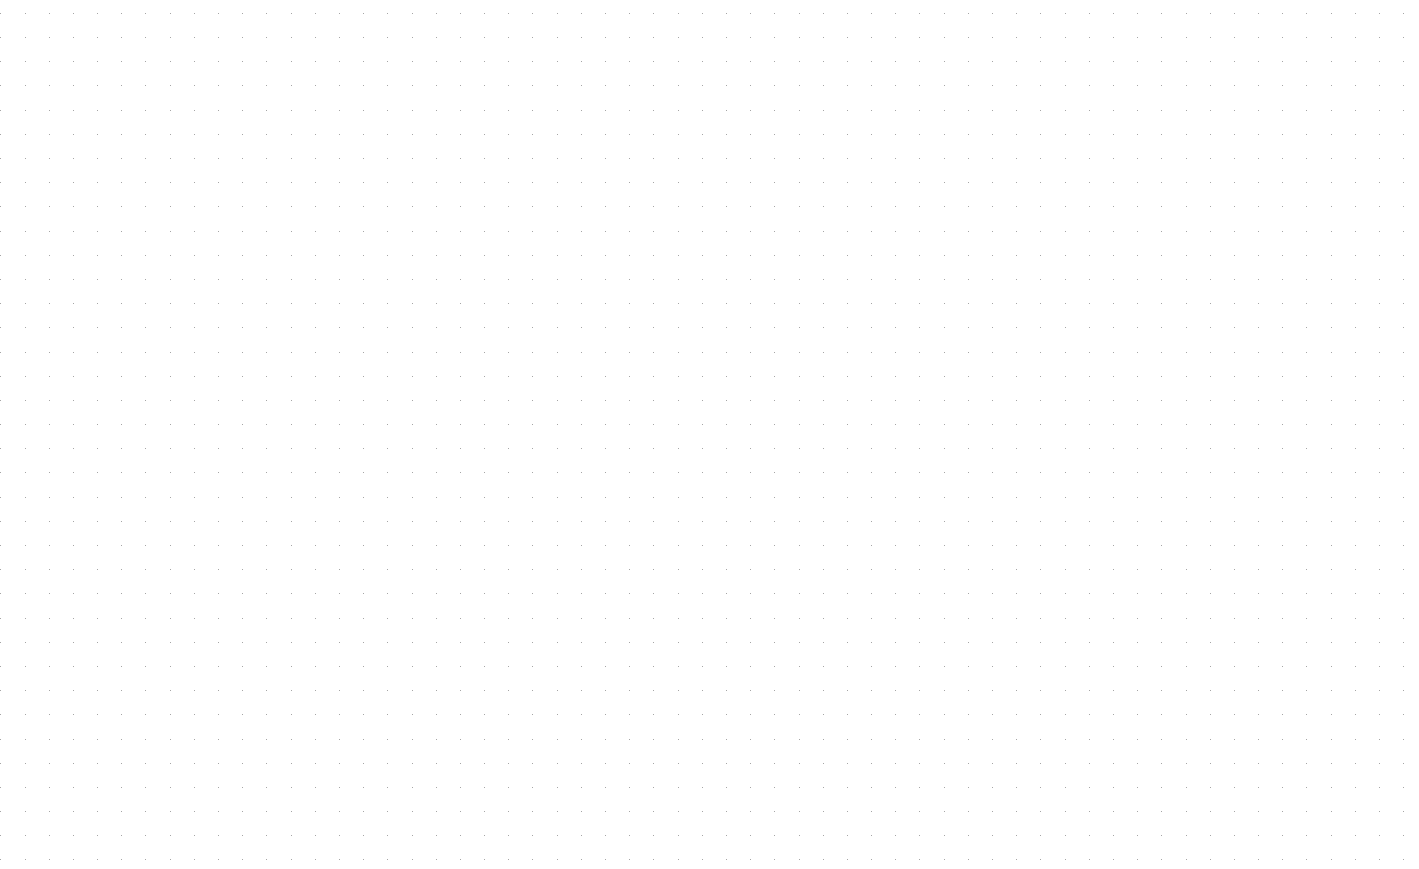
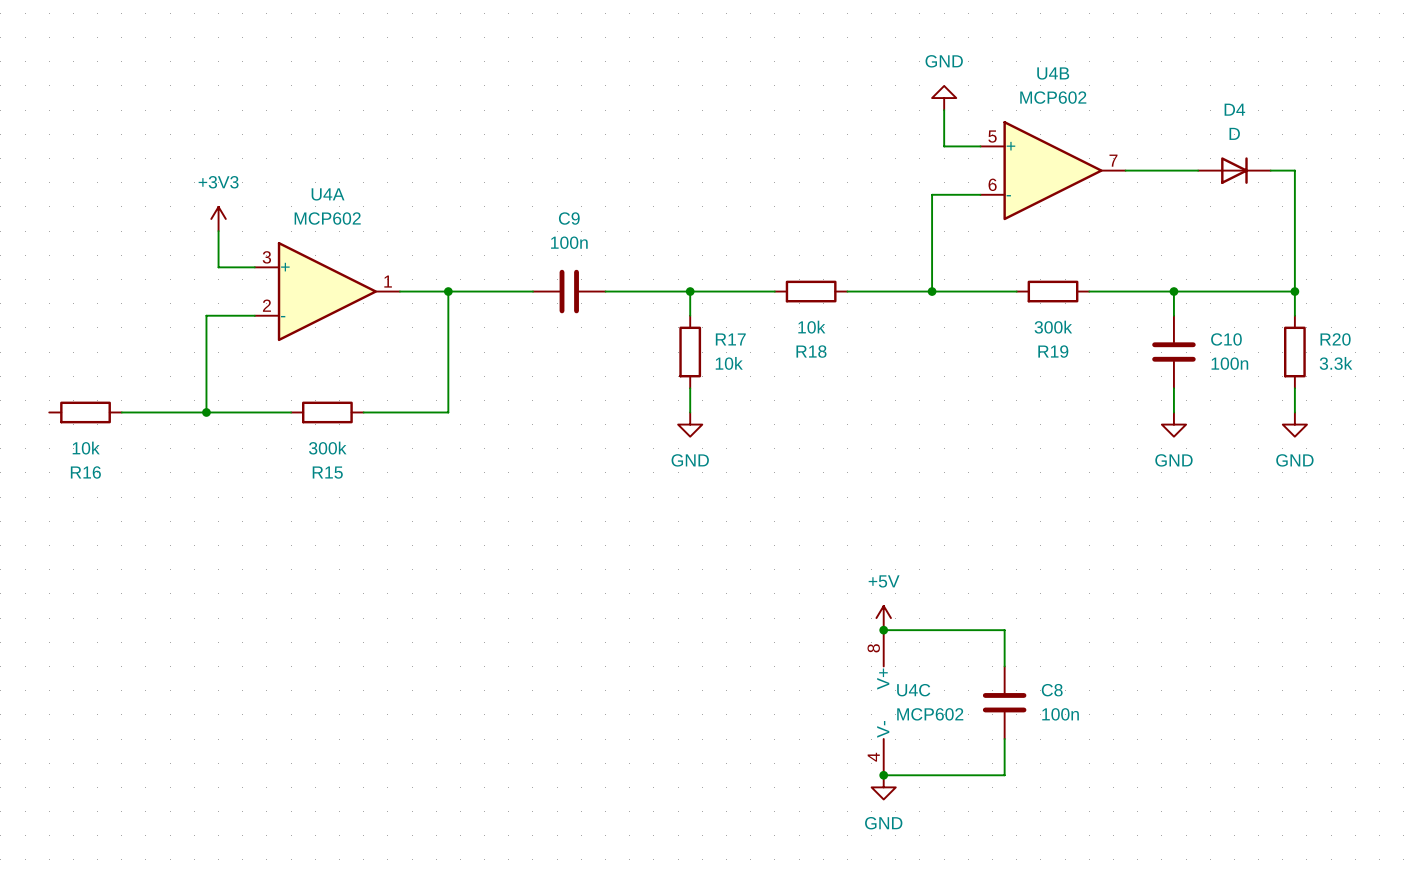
power symbol: none -> GND (944, 98)
wire: none -> (944, 110) (944, 146) (980, 146)
U4B: none -> MCP602 (1053, 170)
wire: none -> (1125, 170) (1198, 170)
D4: none -> D (1234, 170)
wire: none -> (1270, 170) (1294, 170) (1294, 315)
wire: none -> (980, 194) (932, 194) (932, 291)
power symbol: none -> +3V3 (218, 218)
wire: none -> (218, 231) (218, 267) (254, 267)
U4A: none -> MCP602 (327, 291)
wire: none -> (399, 291) (532, 291)
wire: none -> (448, 291) (448, 412) (363, 412)
junction: none -> (448, 291)
C9: none -> 100n (569, 291)
wire: none -> (605, 291) (774, 291)
wire: none -> (690, 291) (690, 315)
junction: none -> (690, 291)
R18: none -> 10k (811, 291)
wire: none -> (847, 291) (1016, 291)
junction: none -> (932, 291)
R19: none -> 300k (1053, 291)
wire: none -> (1089, 291) (1294, 291)
wire: none -> (1173, 291) (1173, 315)
junction: none -> (1173, 291)
junction: none -> (1294, 291)
wire: none -> (254, 315) (206, 315) (206, 412)
R17: none -> 10k (690, 352)
C10: none -> 100n (1173, 352)
R20: none -> 3.3k (1294, 352)
wire: none -> (690, 388) (690, 412)
wire: none -> (1173, 388) (1173, 412)
wire: none -> (1294, 388) (1294, 412)
R16: none -> 10k (85, 412)
wire: none -> (121, 412) (291, 412)
junction: none -> (206, 412)
R15: none -> 300k (327, 412)
power symbol: none -> GND (690, 424)
power symbol: none -> GND (1173, 424)
power symbol: none -> GND (1294, 424)
power symbol: none -> +5V (883, 618)
wire: none -> (883, 630) (1004, 630) (1004, 666)
junction: none -> (883, 630)
U4C: none -> MCP602 (883, 702)
C8: none -> 100n (1004, 702)
wire: none -> (1004, 739) (1004, 775) (883, 775)
junction: none -> (883, 775)
power symbol: none -> GND (883, 787)

